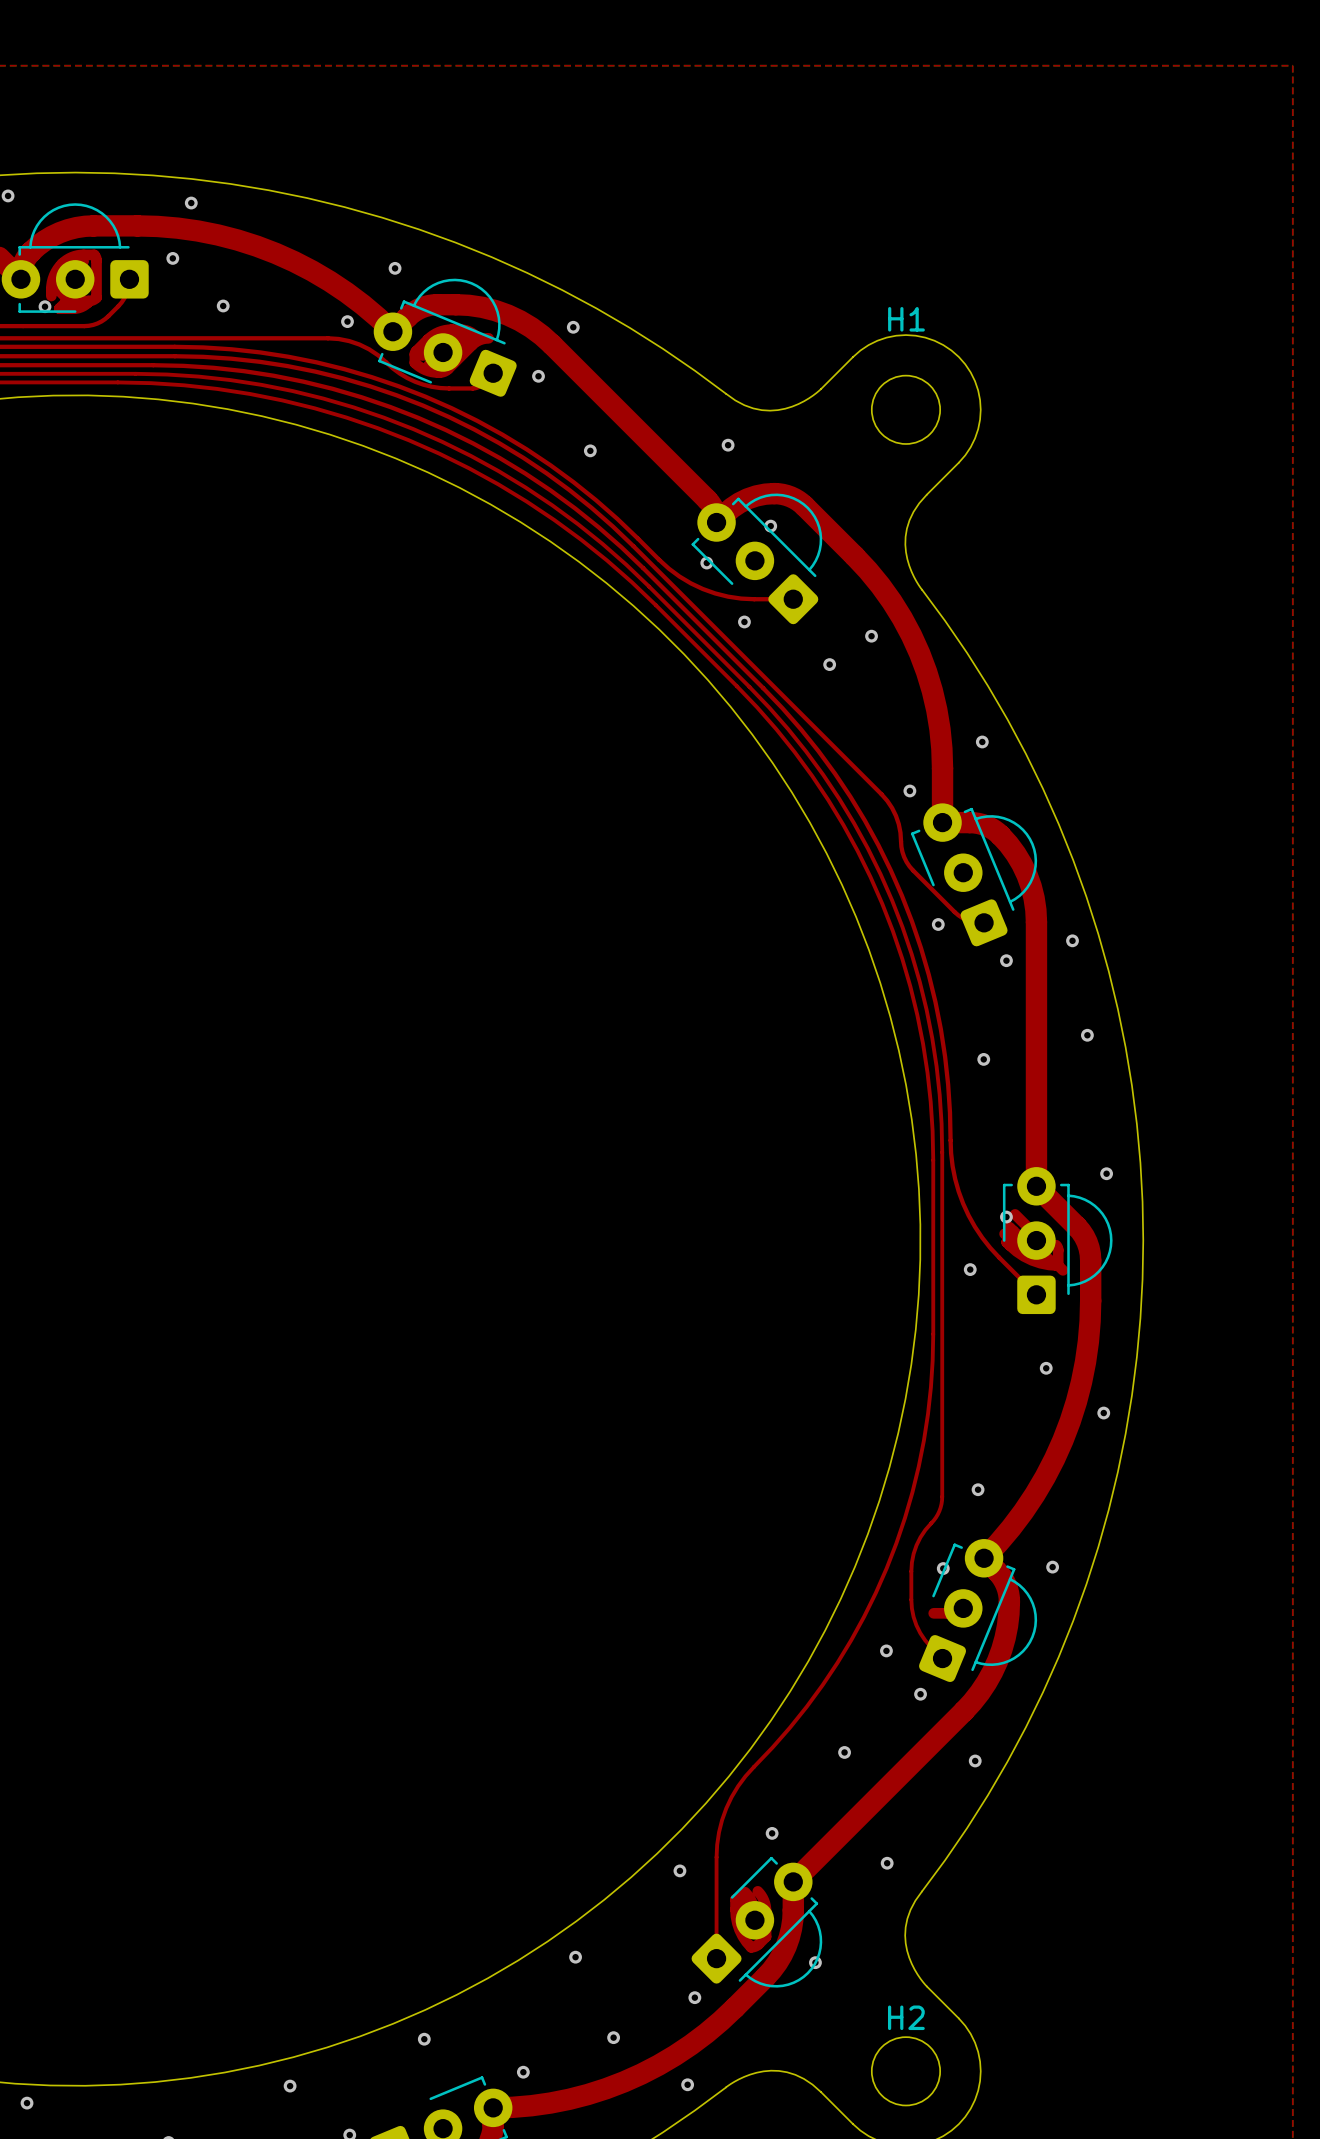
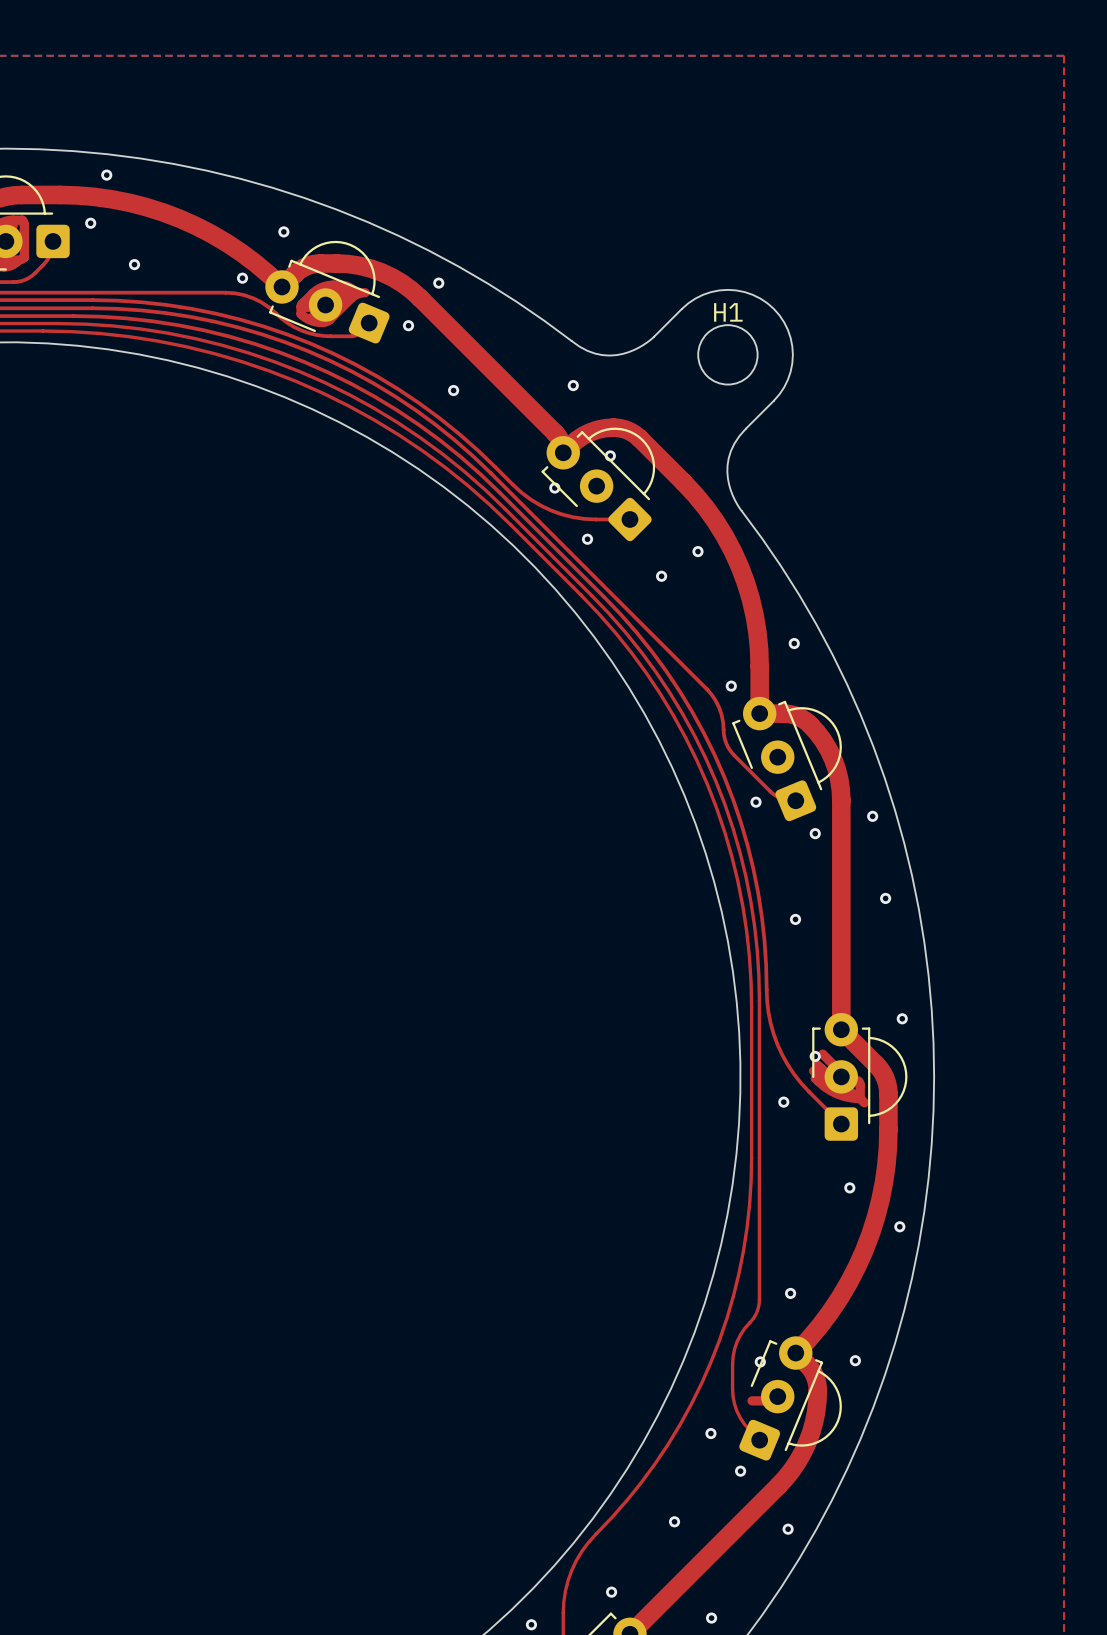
H1 name position: H1 (906, 319) -> H1 (728, 312)

